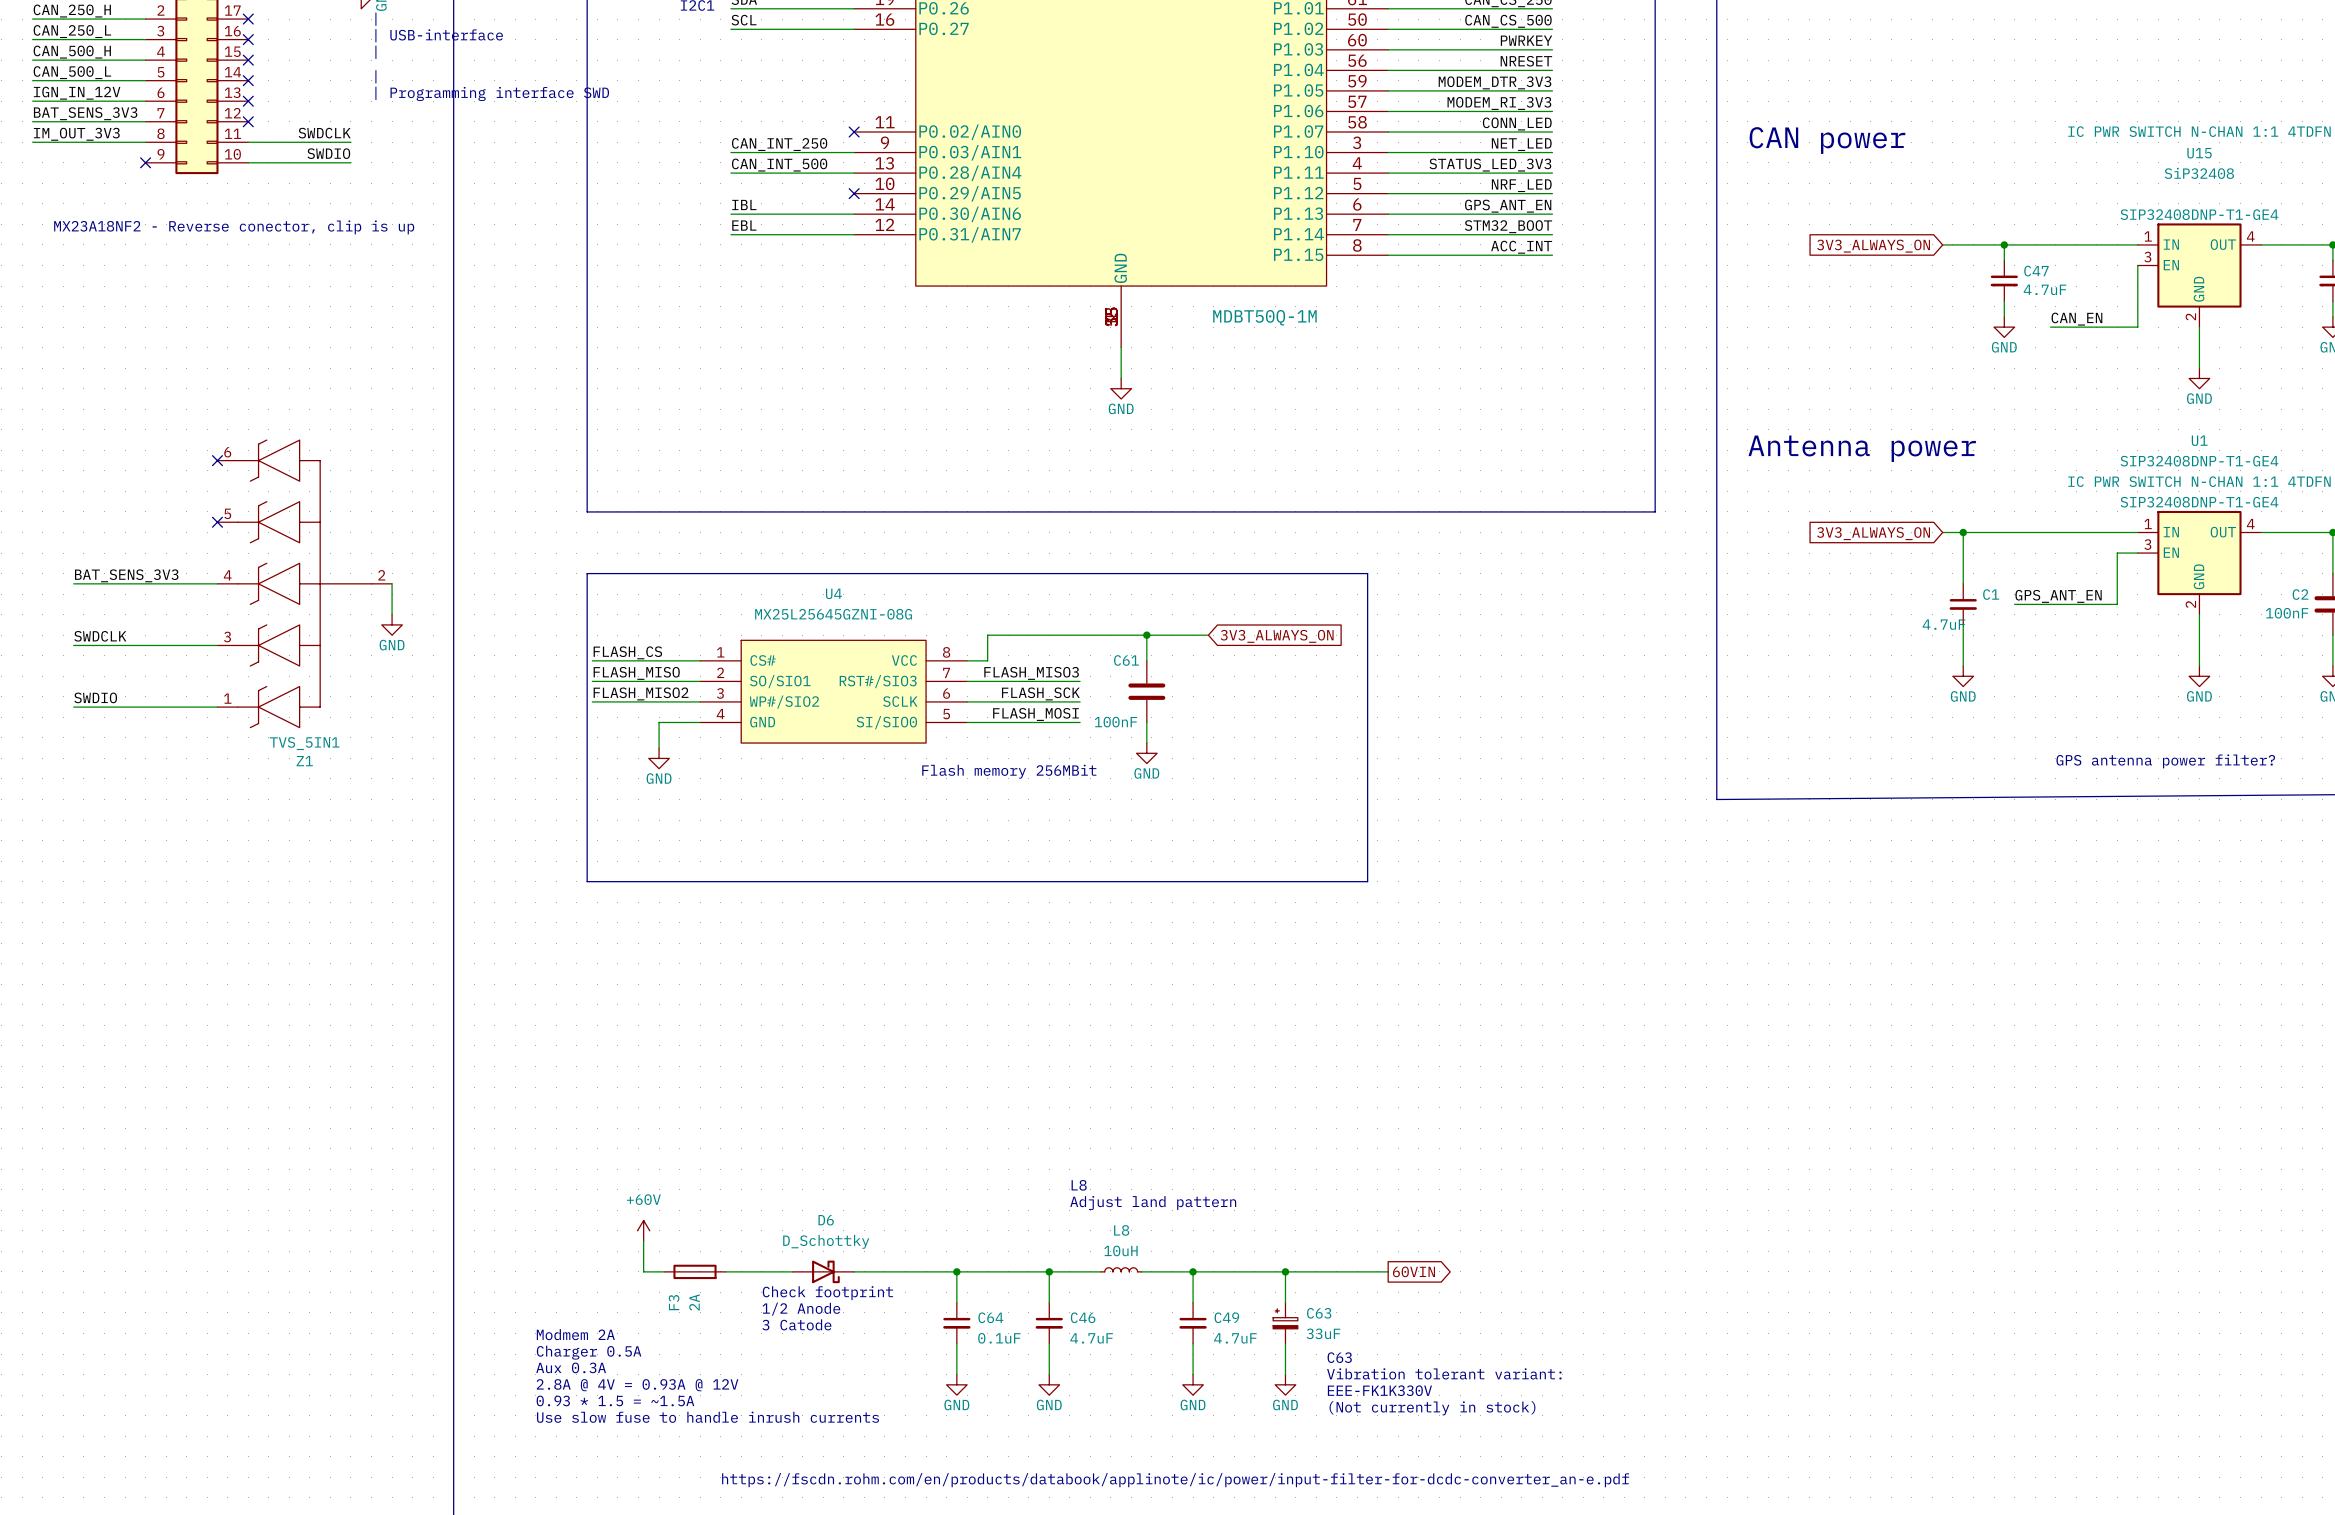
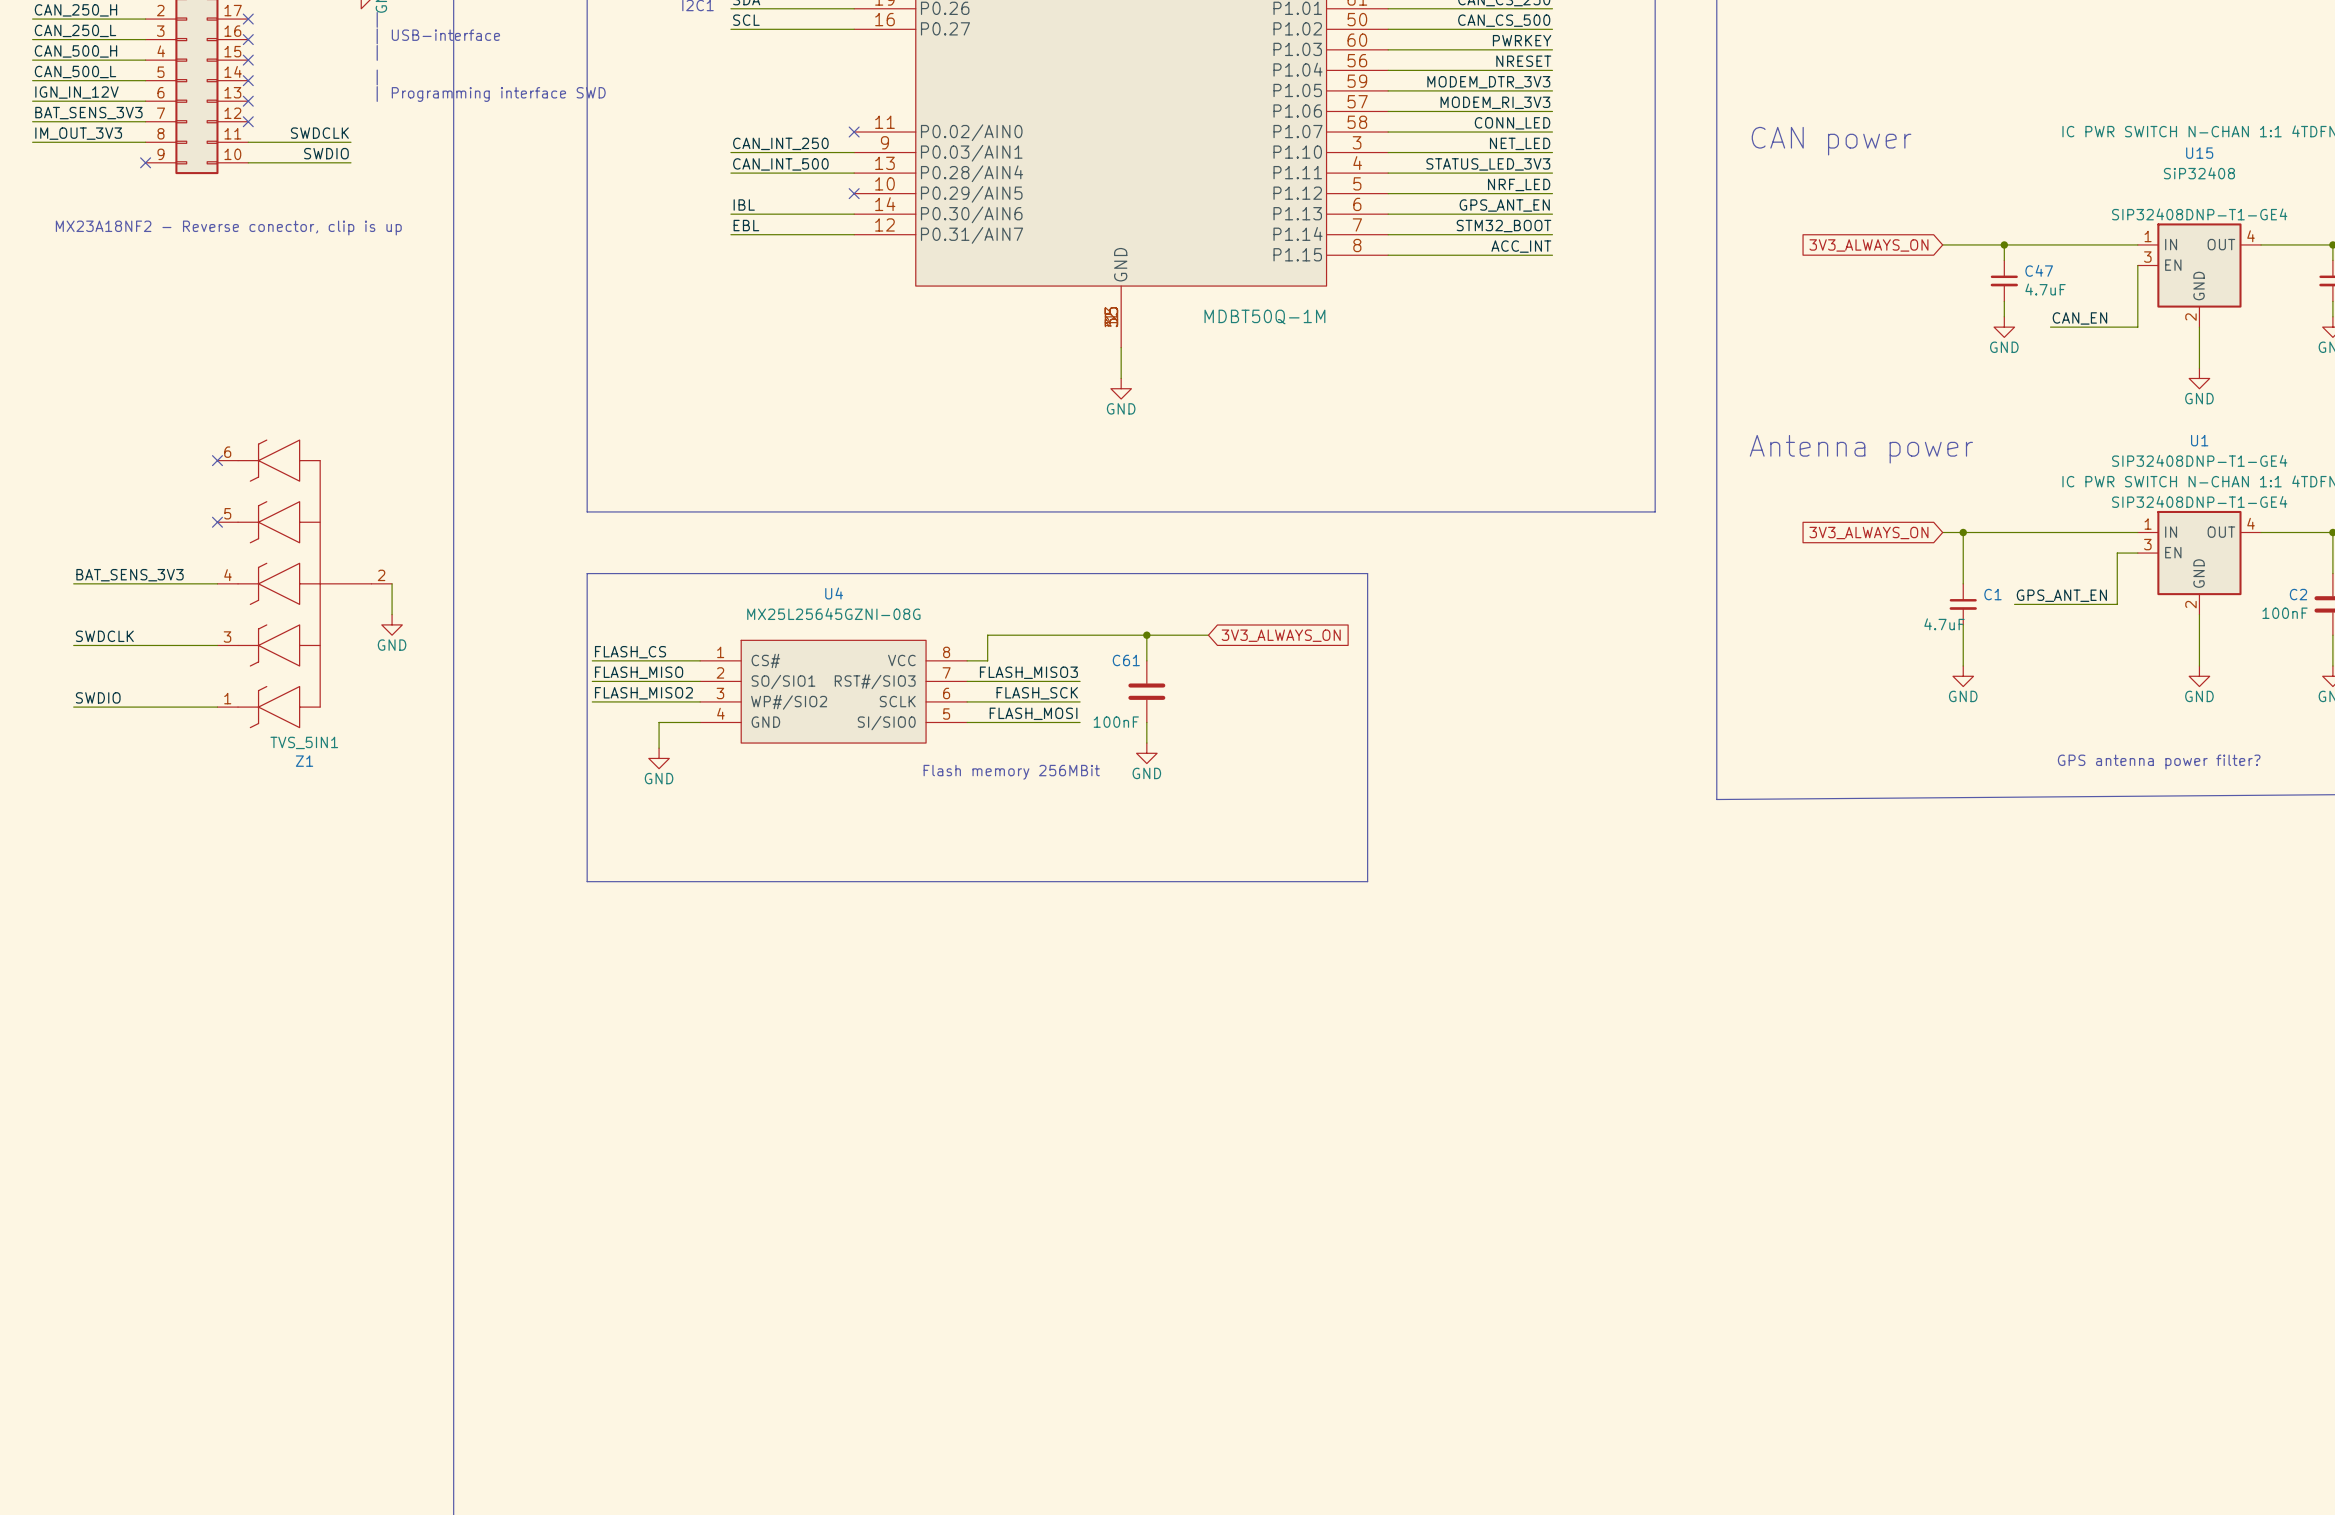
text: L8 (1079, 1185) -> none
text: Adjust land pattern (1153, 1202) -> none
power symbol: +60V (643, 1230) -> none
wire: (643, 1241) (643, 1271) (664, 1271) -> none
L8: 10uH (1121, 1269) -> none
F3: 2A (694, 1271) -> none
wire: (725, 1271) (792, 1271) -> none
D6: D_Schottky (823, 1271) -> none
wire: (854, 1271) (1100, 1271) -> none
wire: (956, 1271) (956, 1302) -> none
junction: (956, 1271) -> none
wire: (1049, 1271) (1049, 1302) -> none
junction: (1049, 1271) -> none
wire: (1141, 1271) (1388, 1271) -> none
wire: (1193, 1271) (1193, 1302) -> none
junction: (1193, 1271) -> none
wire: (1285, 1271) (1285, 1302) -> none
junction: (1285, 1271) -> none
global label: 60VIN (1413, 1271) -> none
text: Check footprint (827, 1293) -> none
text: 1/2 Anode (801, 1309) -> none
C64: 0.1uF (956, 1323) -> none
C46: 4.7uF (1049, 1323) -> none
C49: 4.7uF (1193, 1323) -> none
C63: 33uF (1285, 1323) -> none
text: 3 Catode (796, 1324) -> none
text: Modmem 2A (575, 1334) -> none
wire: (956, 1343) (956, 1374) -> none
wire: (1049, 1343) (1049, 1374) -> none
wire: (1193, 1343) (1193, 1374) -> none
wire: (1285, 1343) (1285, 1374) -> none
text: Charger 0.5A (589, 1352) -> none
text: C63 (1339, 1357) -> none
text: Aux 0.3A (571, 1367) -> none
text: Vibration tolerant variant: (1444, 1373) -> none
power symbol: GND (956, 1384) -> none
power symbol: GND (1049, 1384) -> none
power symbol: GND (1193, 1384) -> none
power symbol: GND (1285, 1384) -> none
text: 2.8A @ 4V = 0.93A @ 12V (637, 1385) -> none
text: EEE-FK1K330V (1379, 1390) -> none
text: 0.93 * 1.5 = ~1.5A (615, 1400) -> none
text: (Not currently in stock) (1432, 1408) -> none
text: Use slow fuse to handle inrush currents (707, 1417) -> none
text: https://fscdn.rohm.com/en/products/databook/applinote/ic/power/input-filter-for-dcdc-converter_an-e.pdf (1175, 1480) -> none

